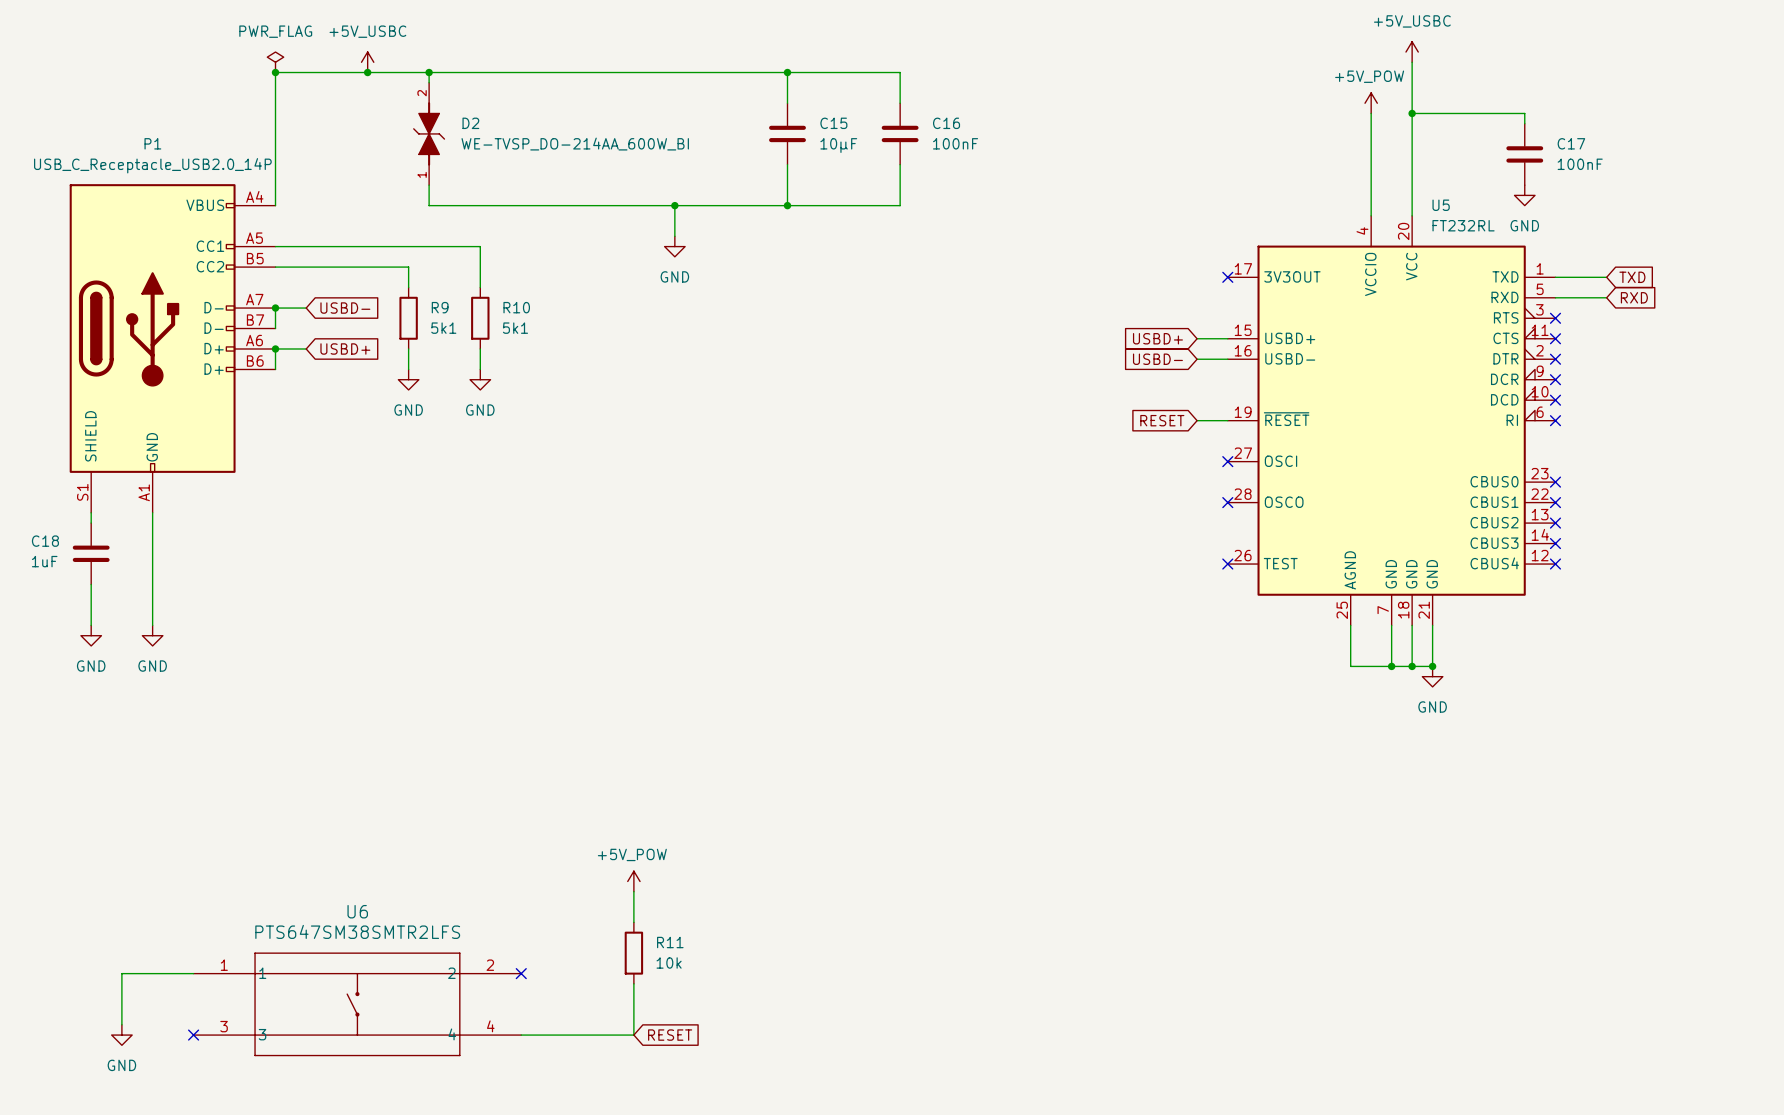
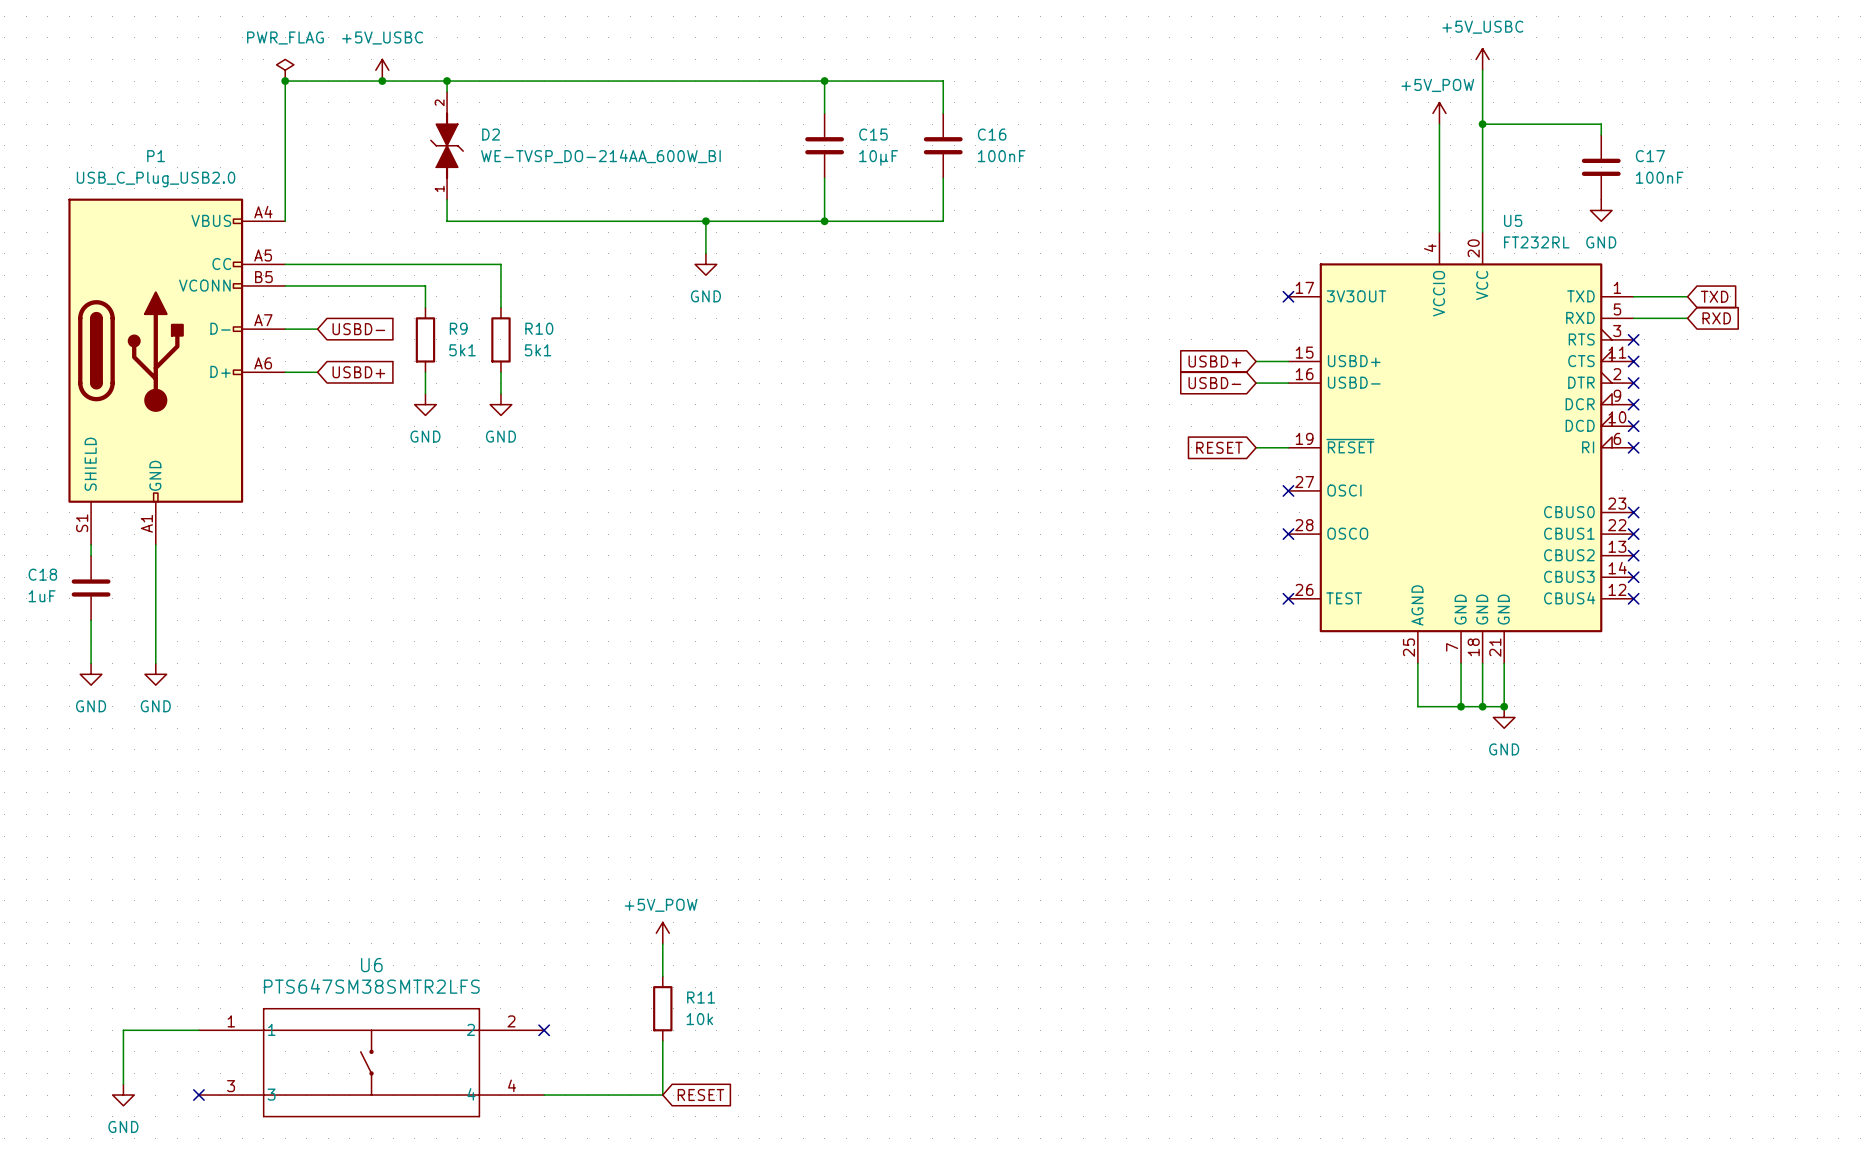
P1 value: USB_C_Receptacle_USB2.0_14P (152, 165) -> USB_C_Plug_USB2.0 (156, 179)
P1 symbol: [69, 184, 276, 513] -> [68, 198, 286, 545]
wire: (275, 308) (275, 328) -> none
junction: (275, 308) -> none
wire: (275, 348) (275, 369) -> none
junction: (275, 348) -> none

